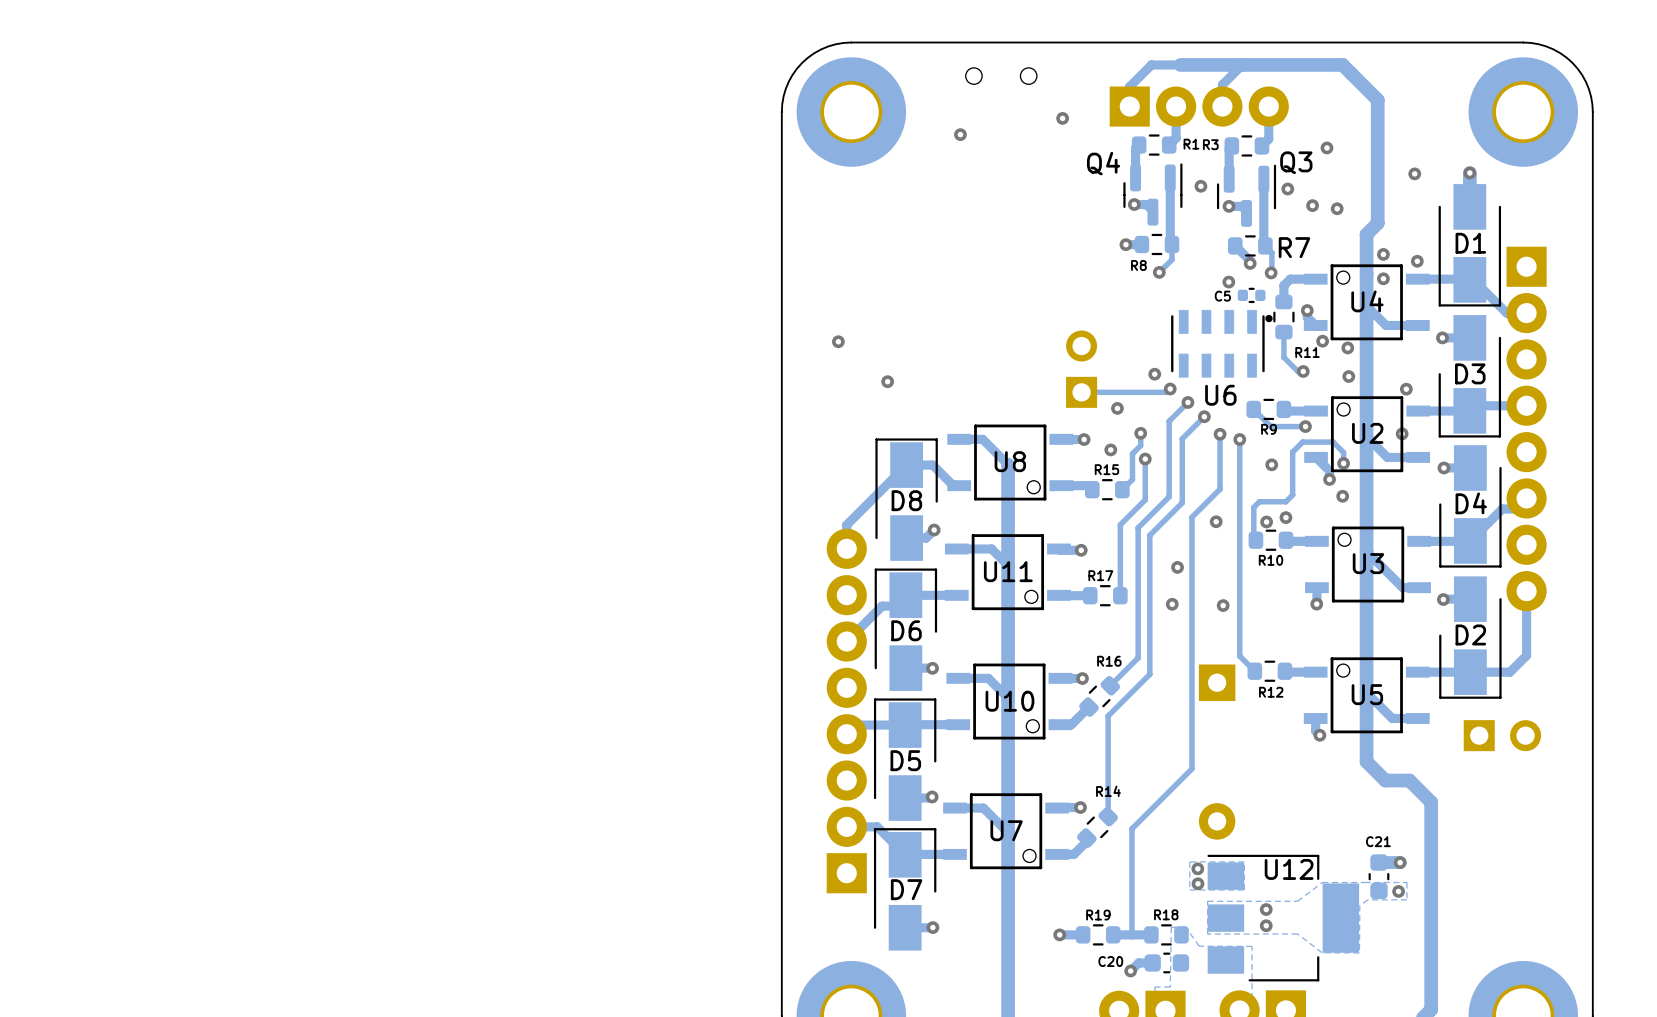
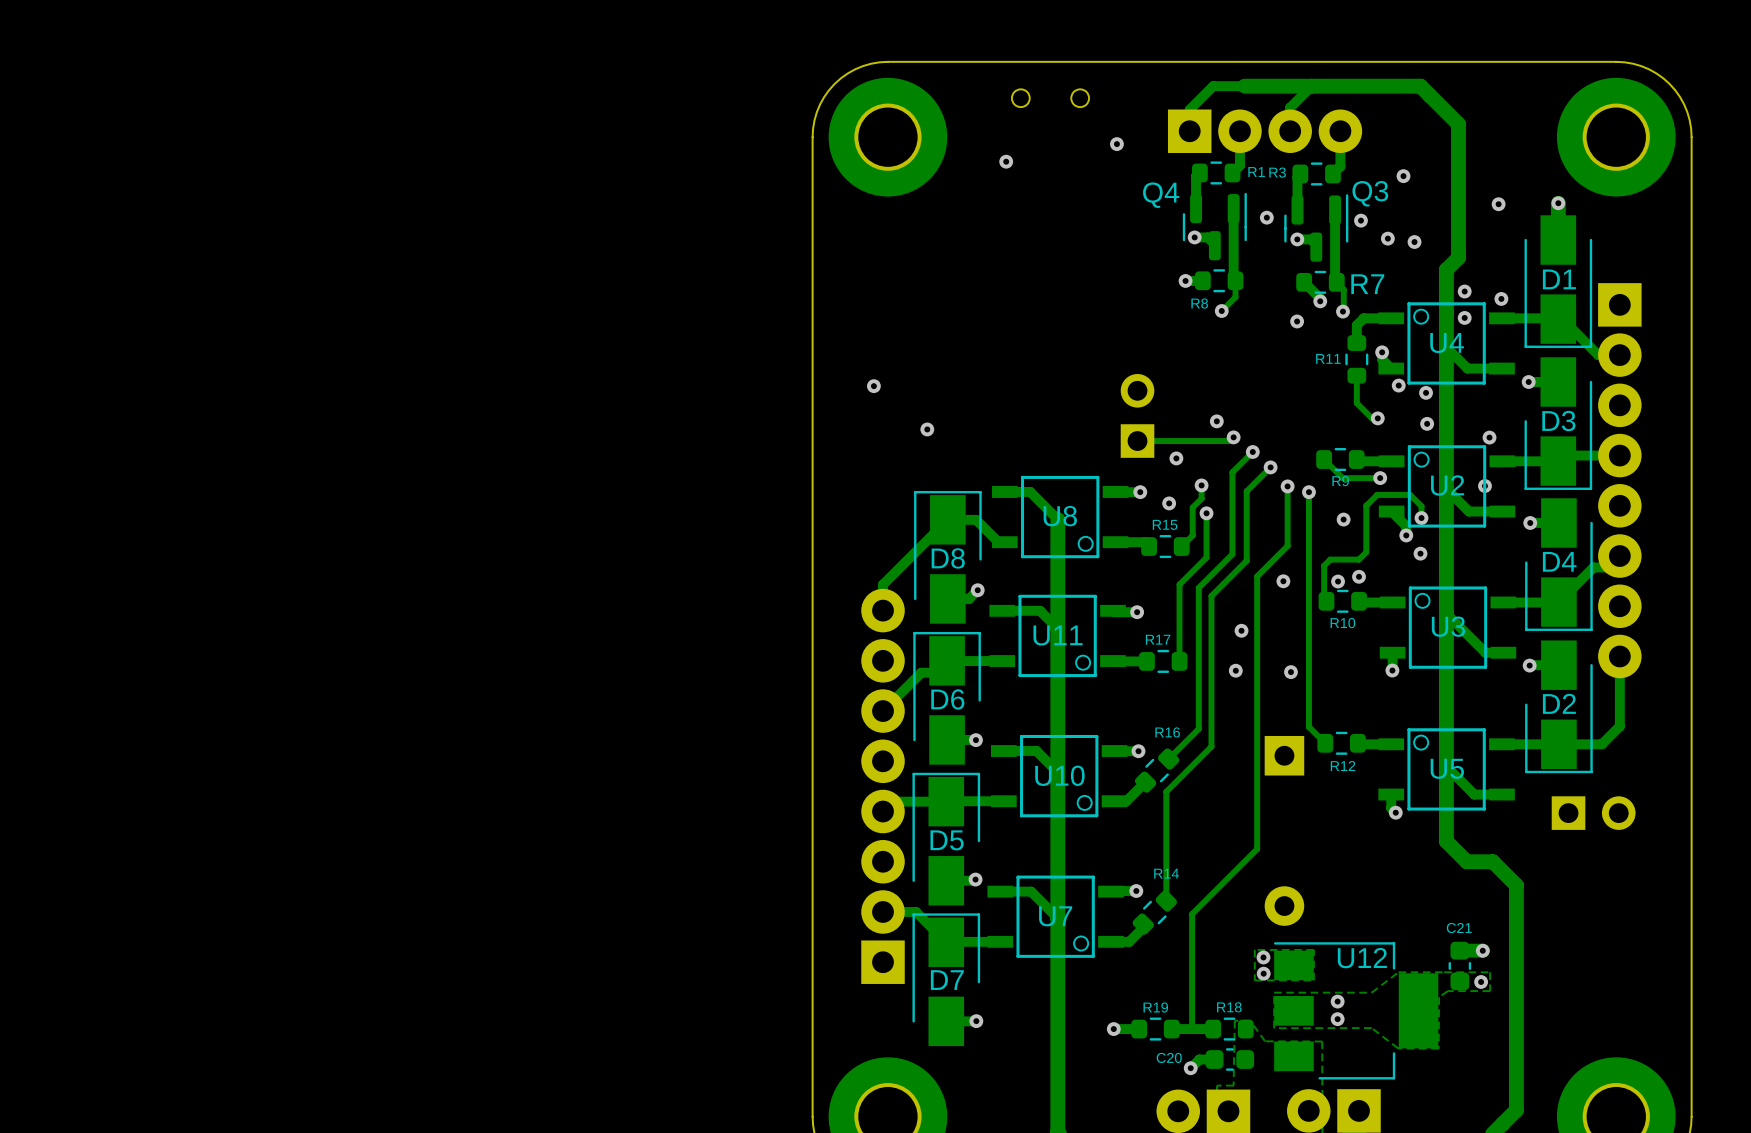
C5: (1251, 295) -> none
U6: (1221, 343) -> none
R11 name position: R11 (1307, 352) -> R11 (1328, 358)

